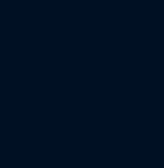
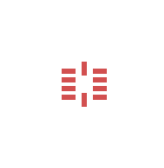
part: none -> (84, 84)

